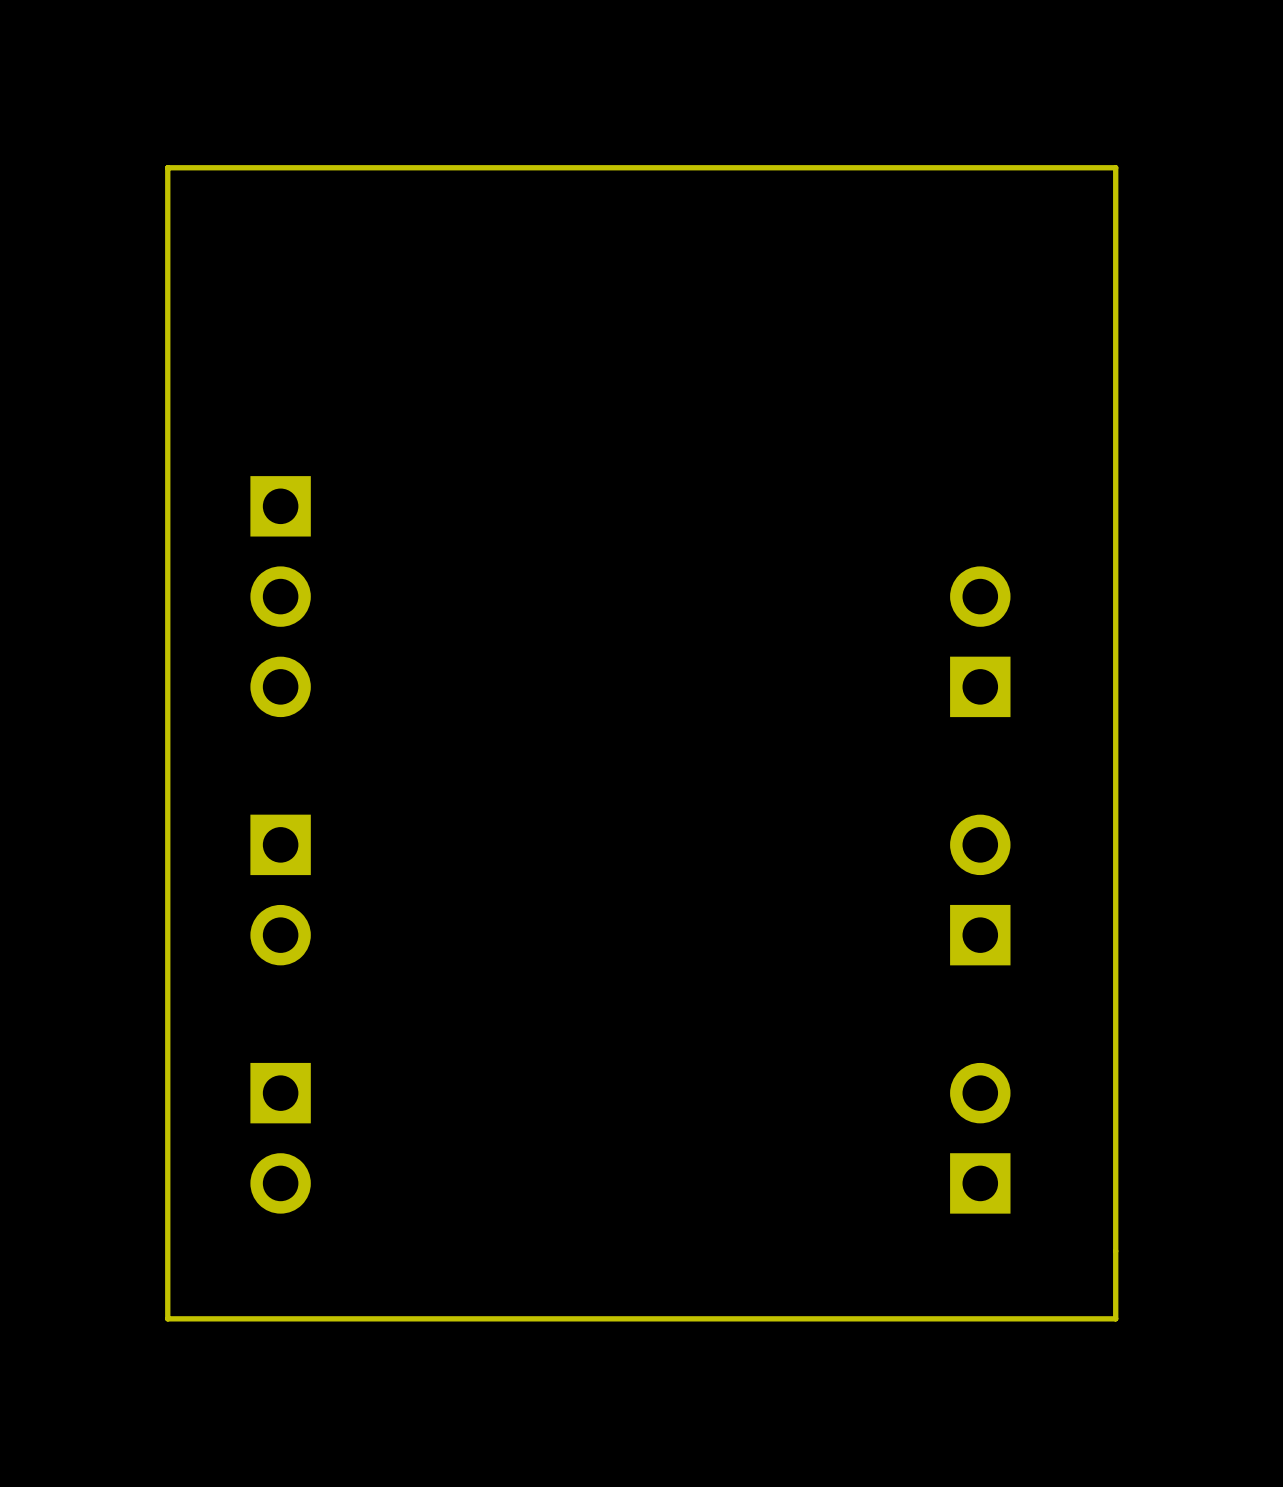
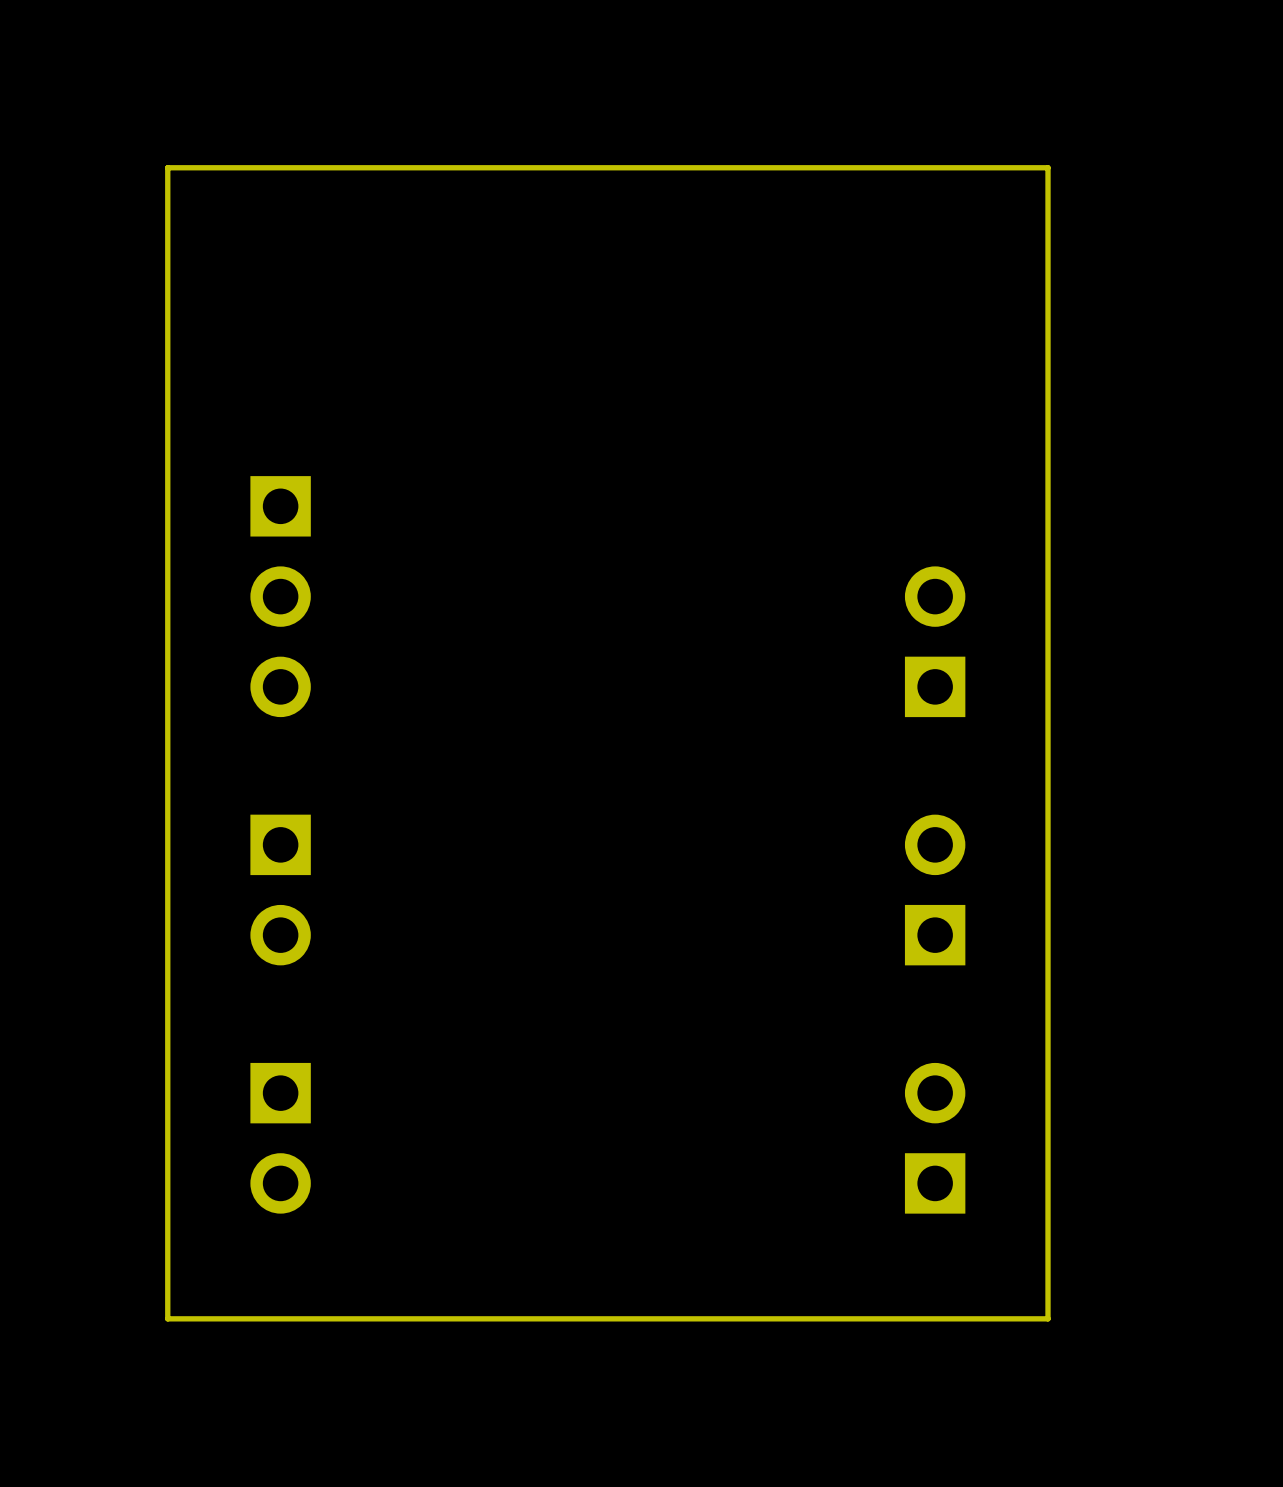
board edge: (1048, 167) (1115, 167) (1115, 1318) (1048, 1318) -> (1048, 167) (1048, 1318)
part position: (980, 641) -> (935, 641)
part position: (980, 890) -> (935, 890)
part position: (980, 1138) -> (935, 1138)

